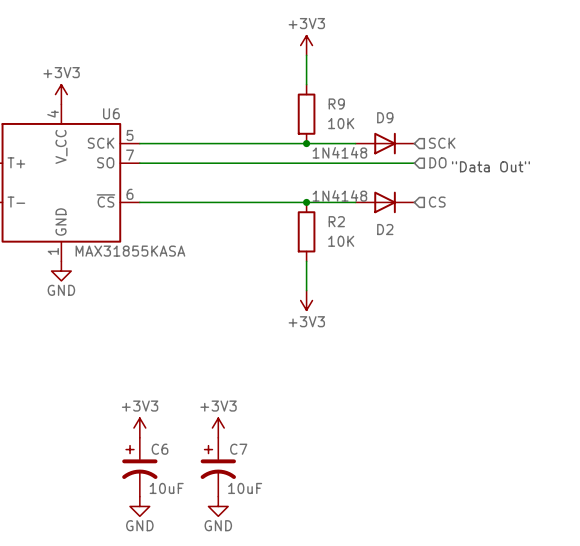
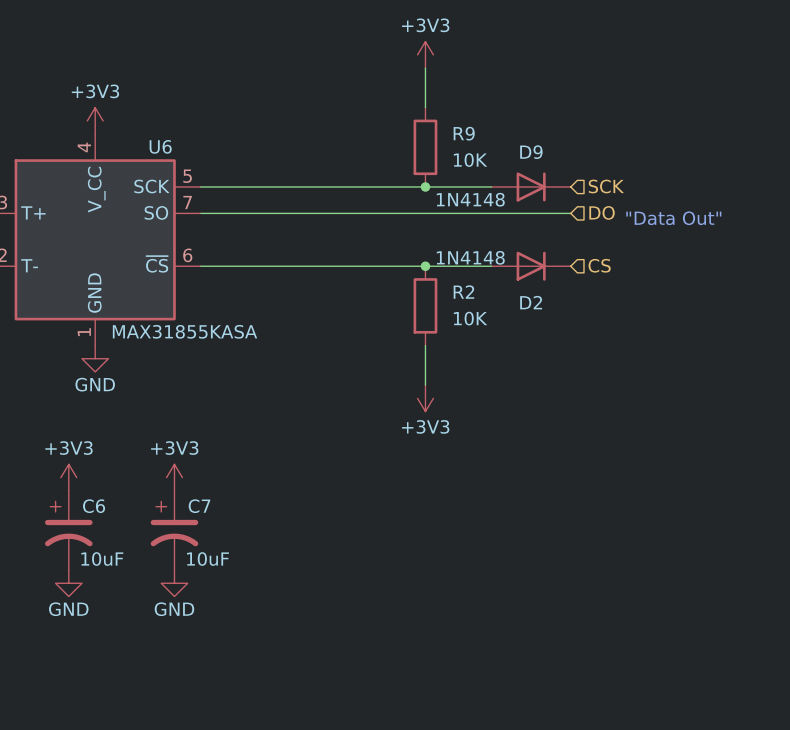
power symbol: none -> +3V3 (68, 477)
power symbol: none -> +3V3 (174, 477)
power symbol: +3V3 (139, 428) -> none
power symbol: +3V3 (218, 428) -> none
power symbol: none -> GND (68, 583)
power symbol: none -> GND (174, 583)
C6 position: (139, 467) -> (68, 530)
C7 position: (218, 467) -> (174, 530)
power symbol: GND (139, 506) -> none
power symbol: GND (218, 506) -> none

